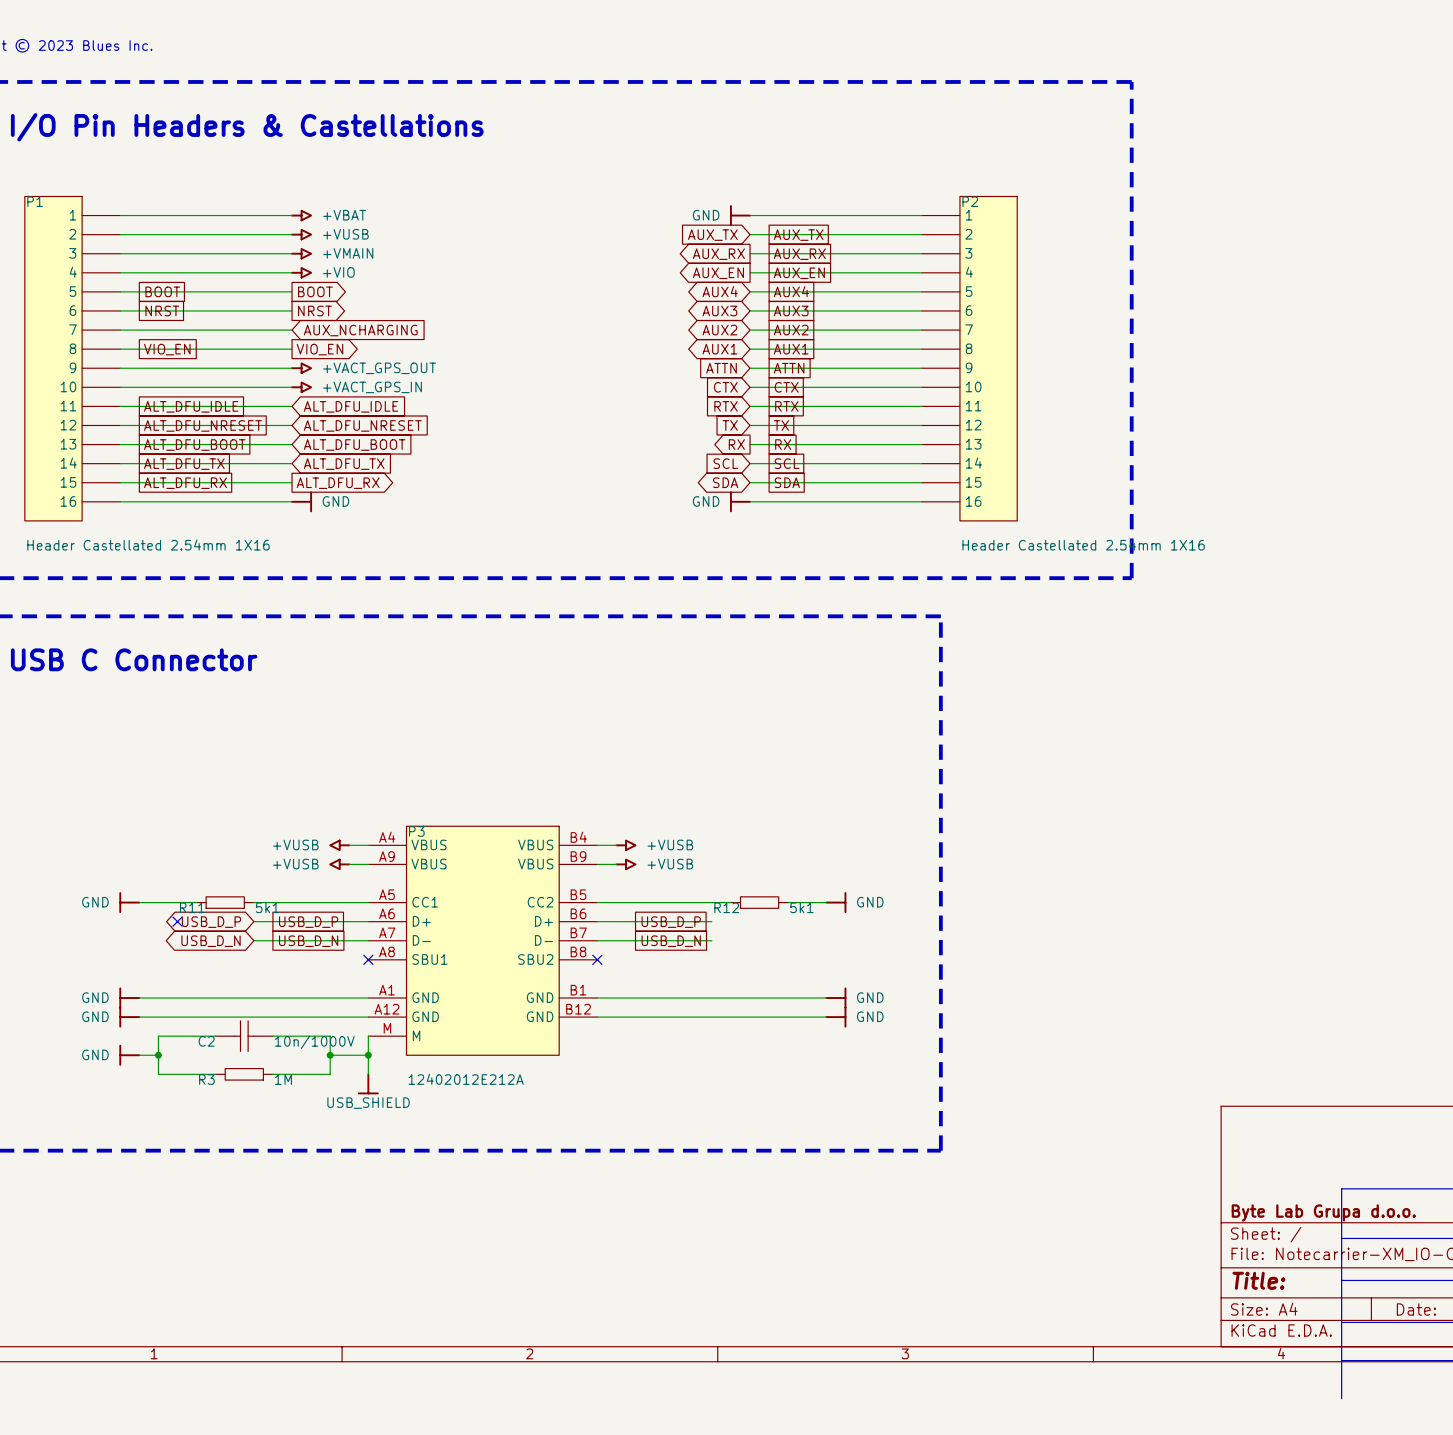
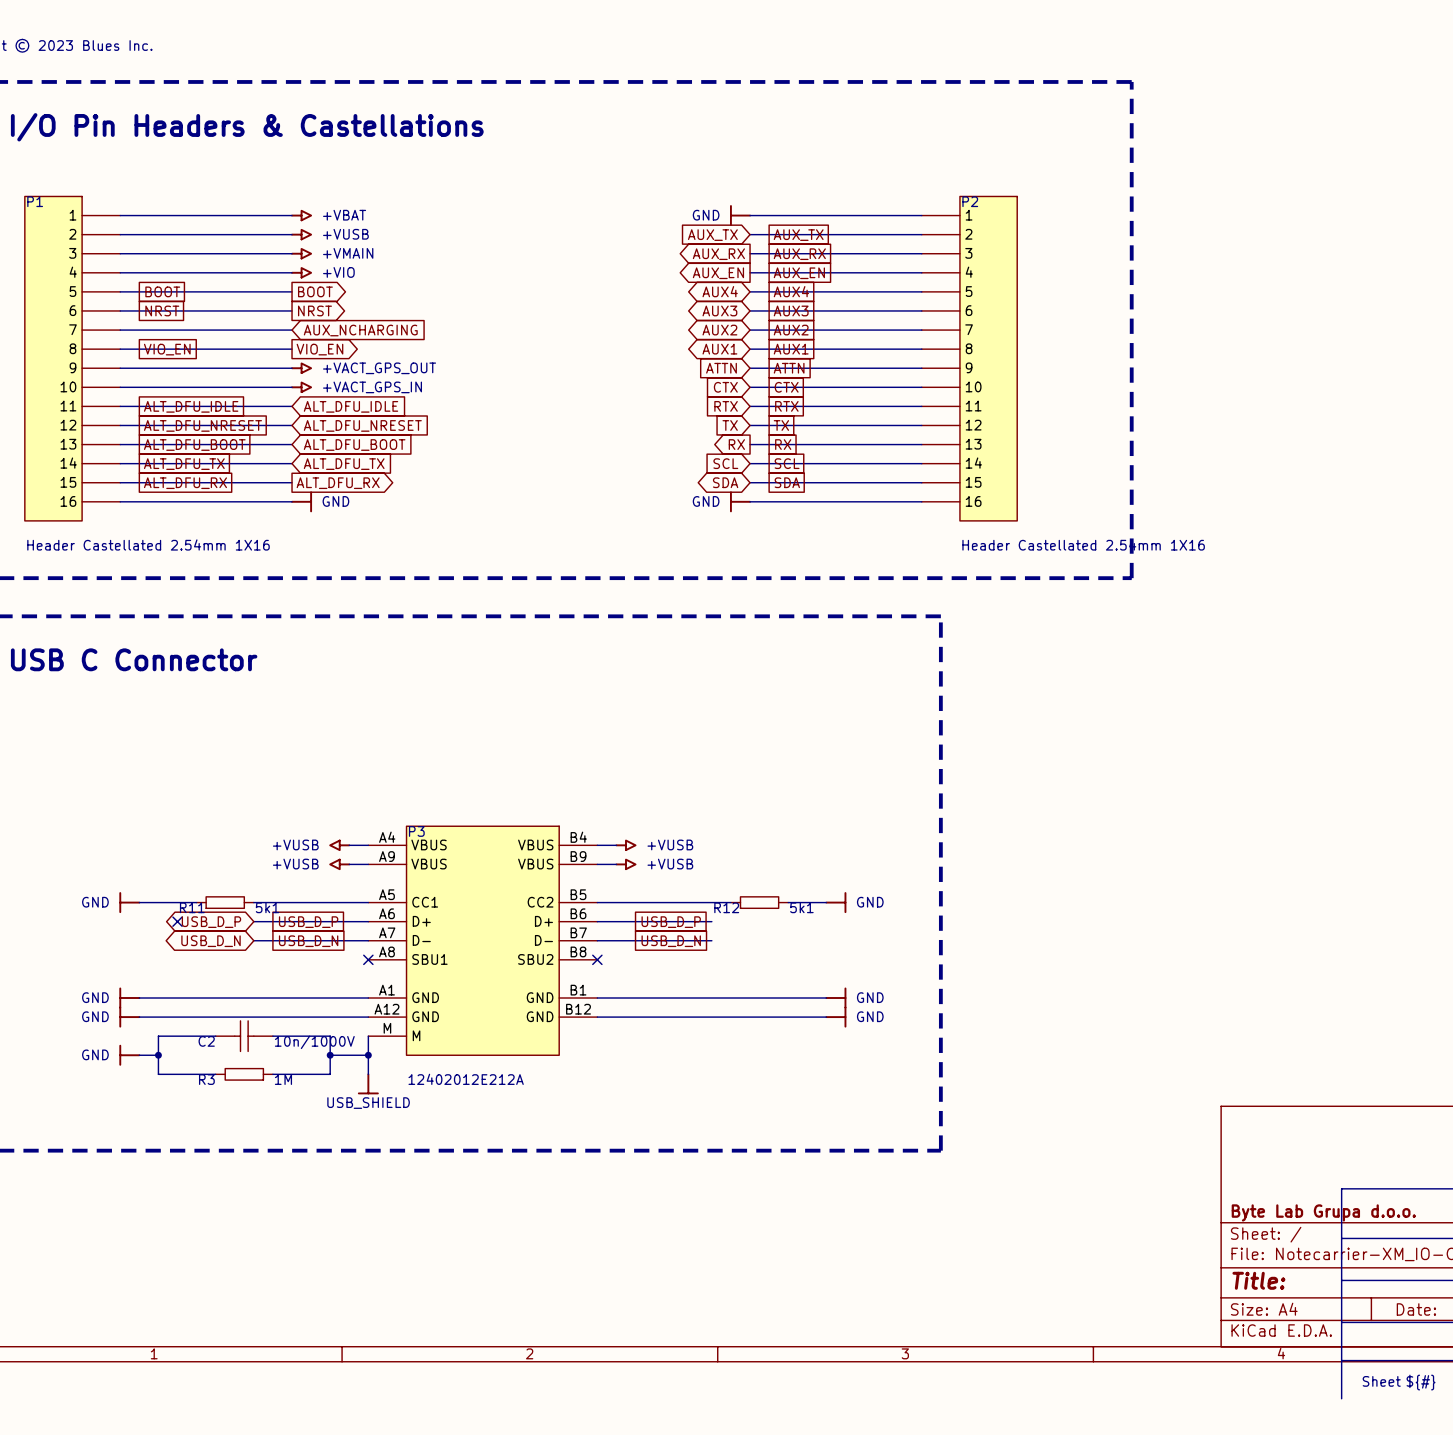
text: none -> Sheet (1381, 1381)
text: none -> ${#} (1421, 1382)

